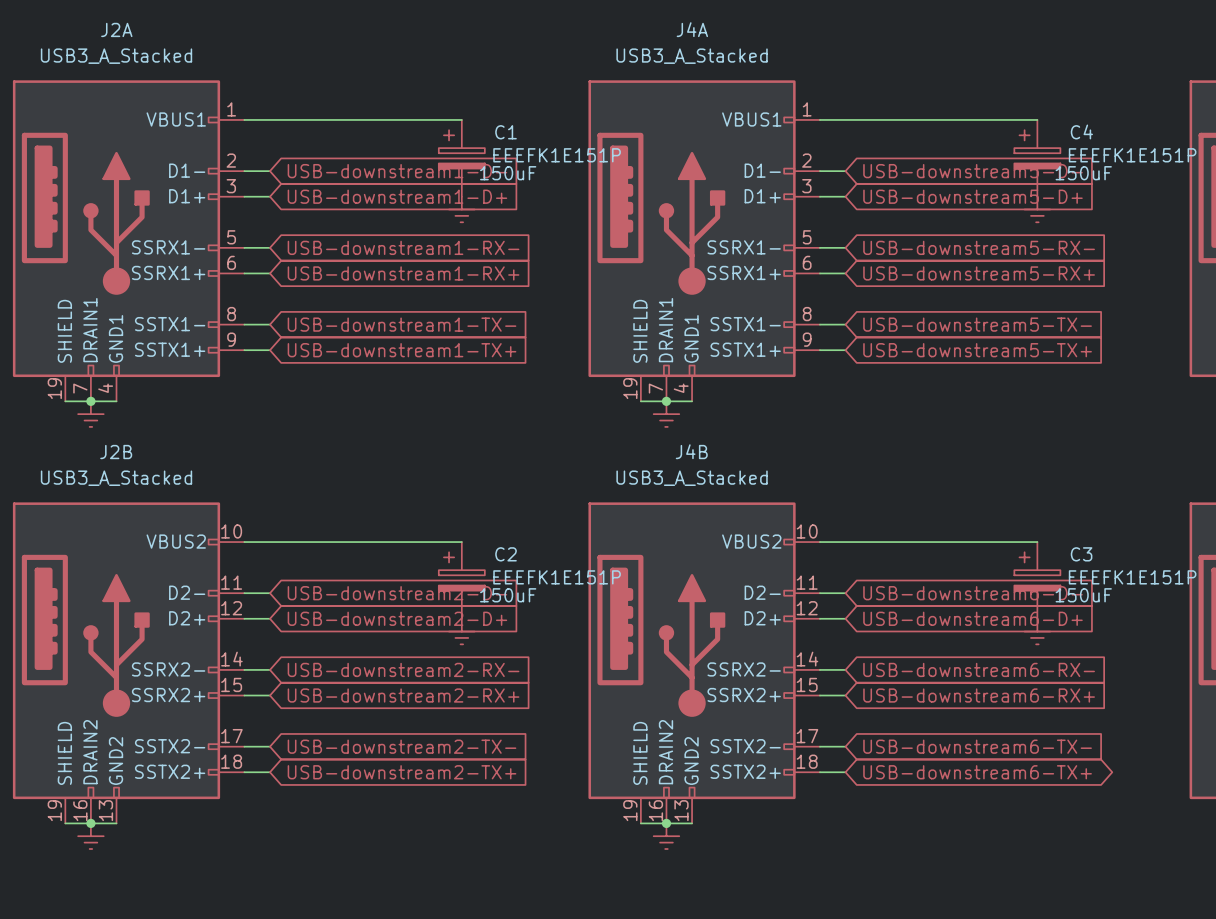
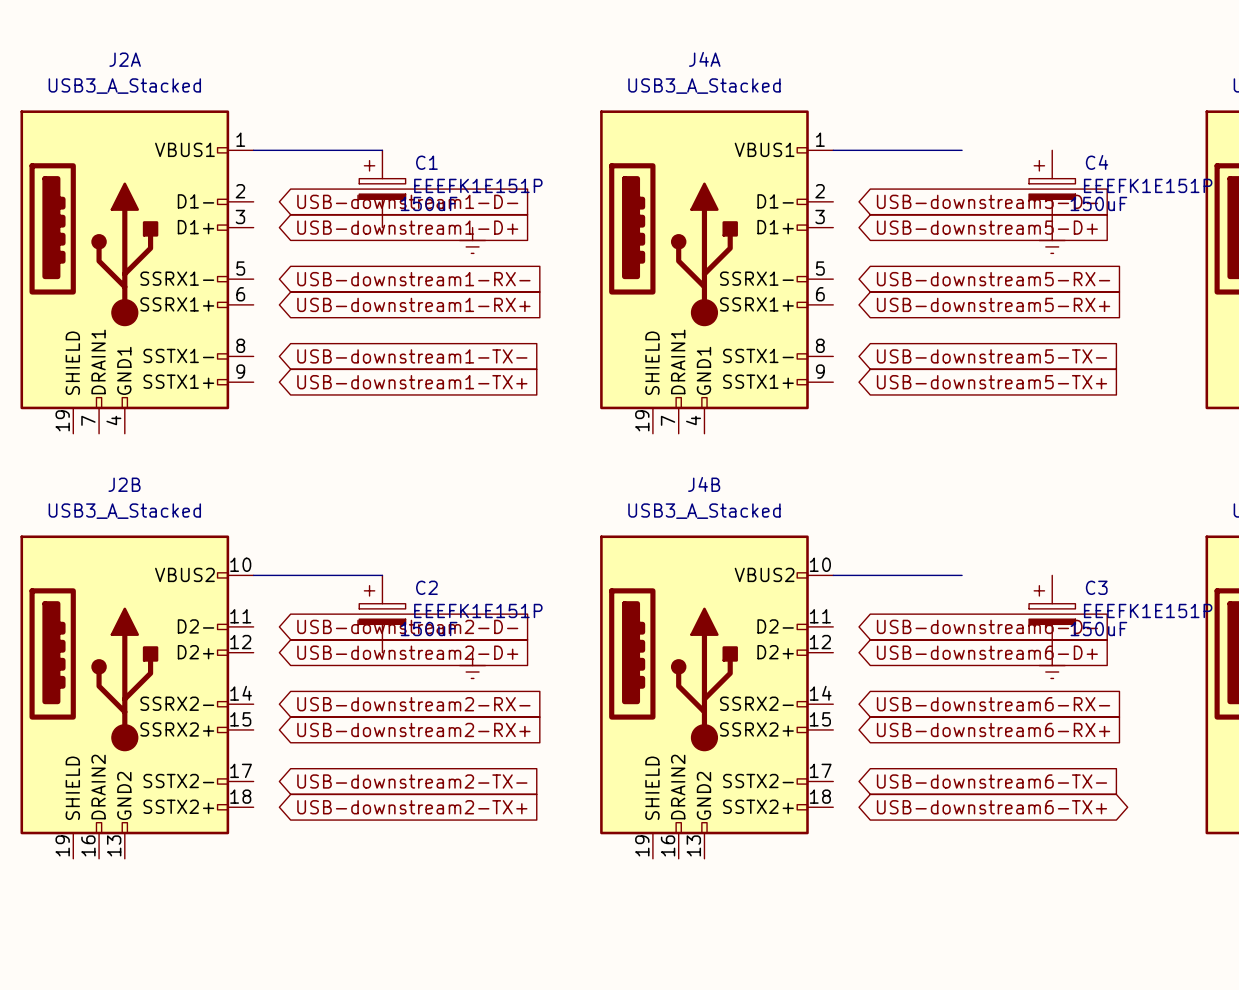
wire: (372, 119) (461, 119) -> none
wire: (947, 119) (1037, 119) -> none
C1 position: (461, 158) -> (382, 188)
wire: (244, 171) (269, 171) -> none
wire: (819, 171) (845, 171) -> none
wire: (244, 196) (269, 196) -> none
wire: (819, 196) (845, 196) -> none
wire: (244, 247) (269, 247) -> none
wire: (819, 247) (845, 247) -> none
wire: (244, 273) (269, 273) -> none
wire: (819, 273) (845, 273) -> none
wire: (244, 324) (269, 324) -> none
wire: (819, 324) (845, 324) -> none
wire: (244, 350) (269, 350) -> none
wire: (819, 350) (845, 350) -> none
wire: (65, 401) (116, 401) -> none
junction: (90, 401) -> none
wire: (640, 401) (692, 401) -> none
junction: (666, 401) -> none
power symbol: (90, 414) -> none
power symbol: (666, 414) -> none
wire: (372, 542) (461, 542) -> none
wire: (947, 542) (1037, 542) -> none
C2 position: (461, 580) -> (382, 614)
wire: (244, 593) (269, 593) -> none
wire: (819, 593) (845, 593) -> none
wire: (244, 618) (269, 618) -> none
wire: (819, 618) (845, 618) -> none
wire: (244, 669) (269, 669) -> none
wire: (819, 669) (845, 669) -> none
wire: (244, 695) (269, 695) -> none
wire: (819, 695) (845, 695) -> none
wire: (244, 746) (269, 746) -> none
wire: (819, 746) (845, 746) -> none
wire: (244, 772) (269, 772) -> none
wire: (819, 772) (845, 772) -> none
wire: (65, 823) (116, 823) -> none
junction: (90, 823) -> none
wire: (640, 823) (692, 823) -> none
junction: (666, 823) -> none
power symbol: (90, 836) -> none
power symbol: (666, 836) -> none

